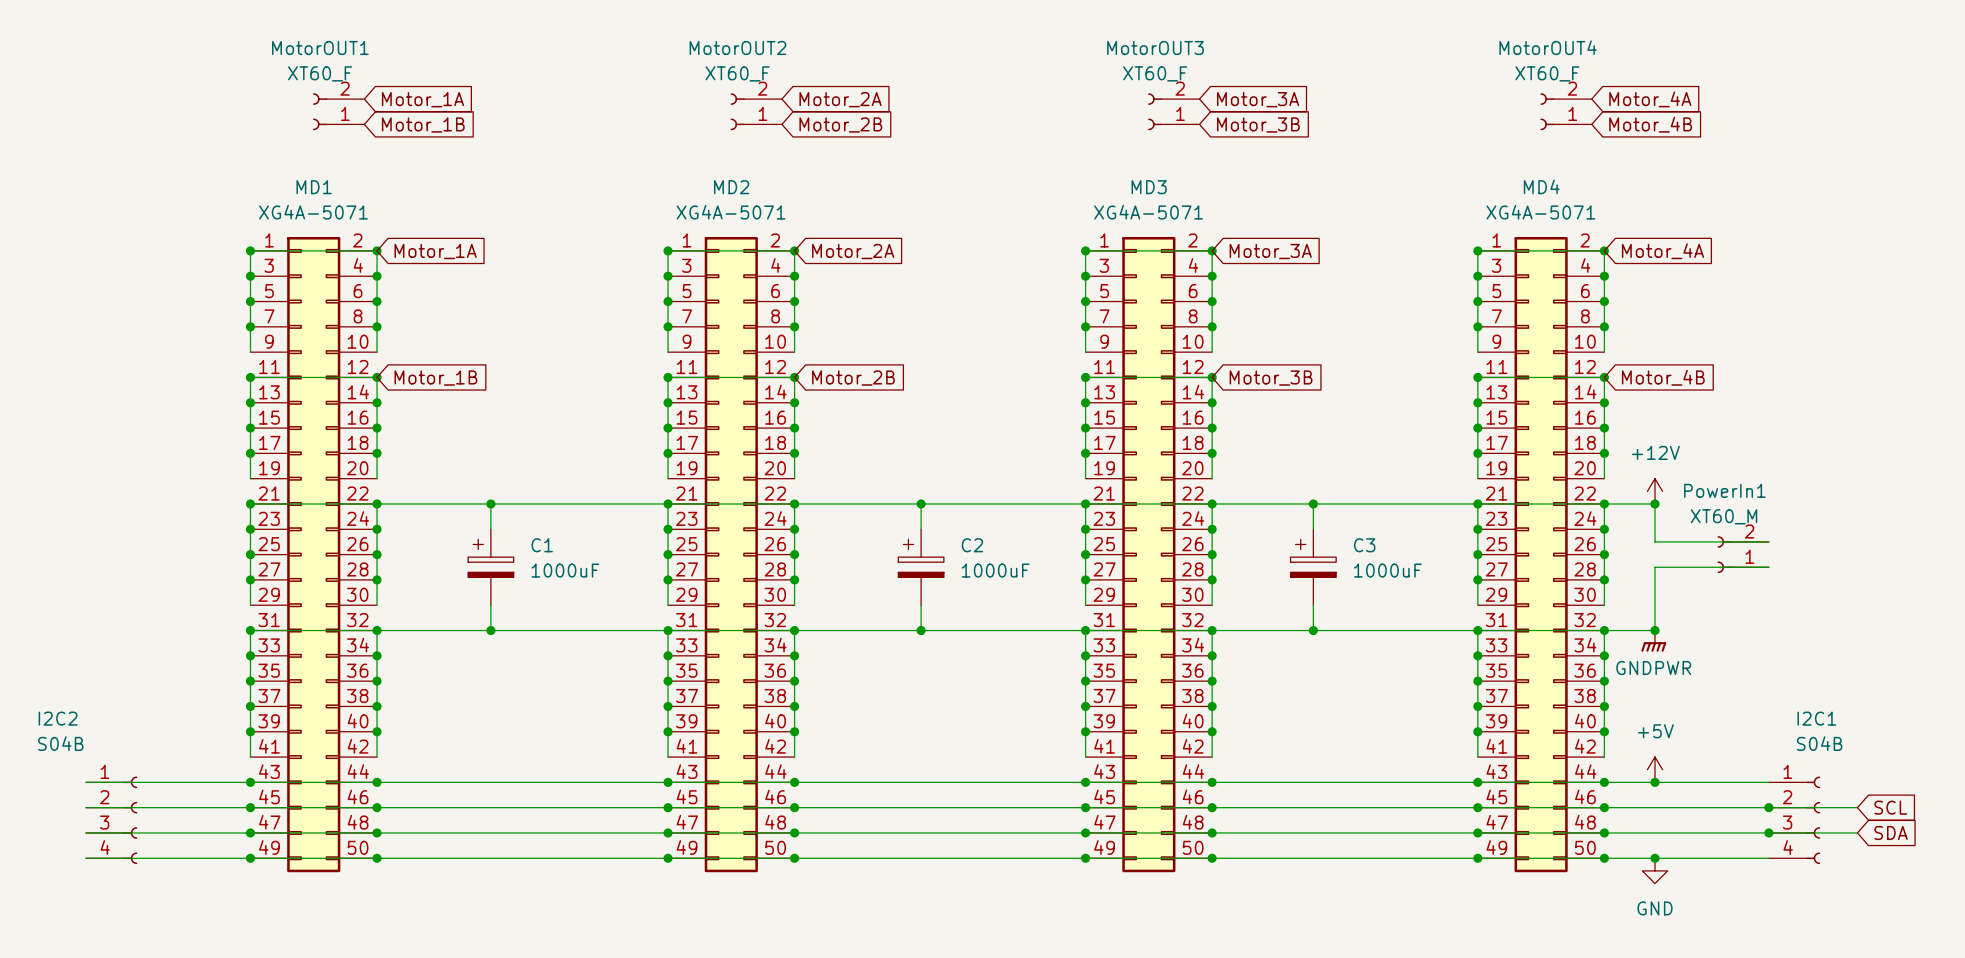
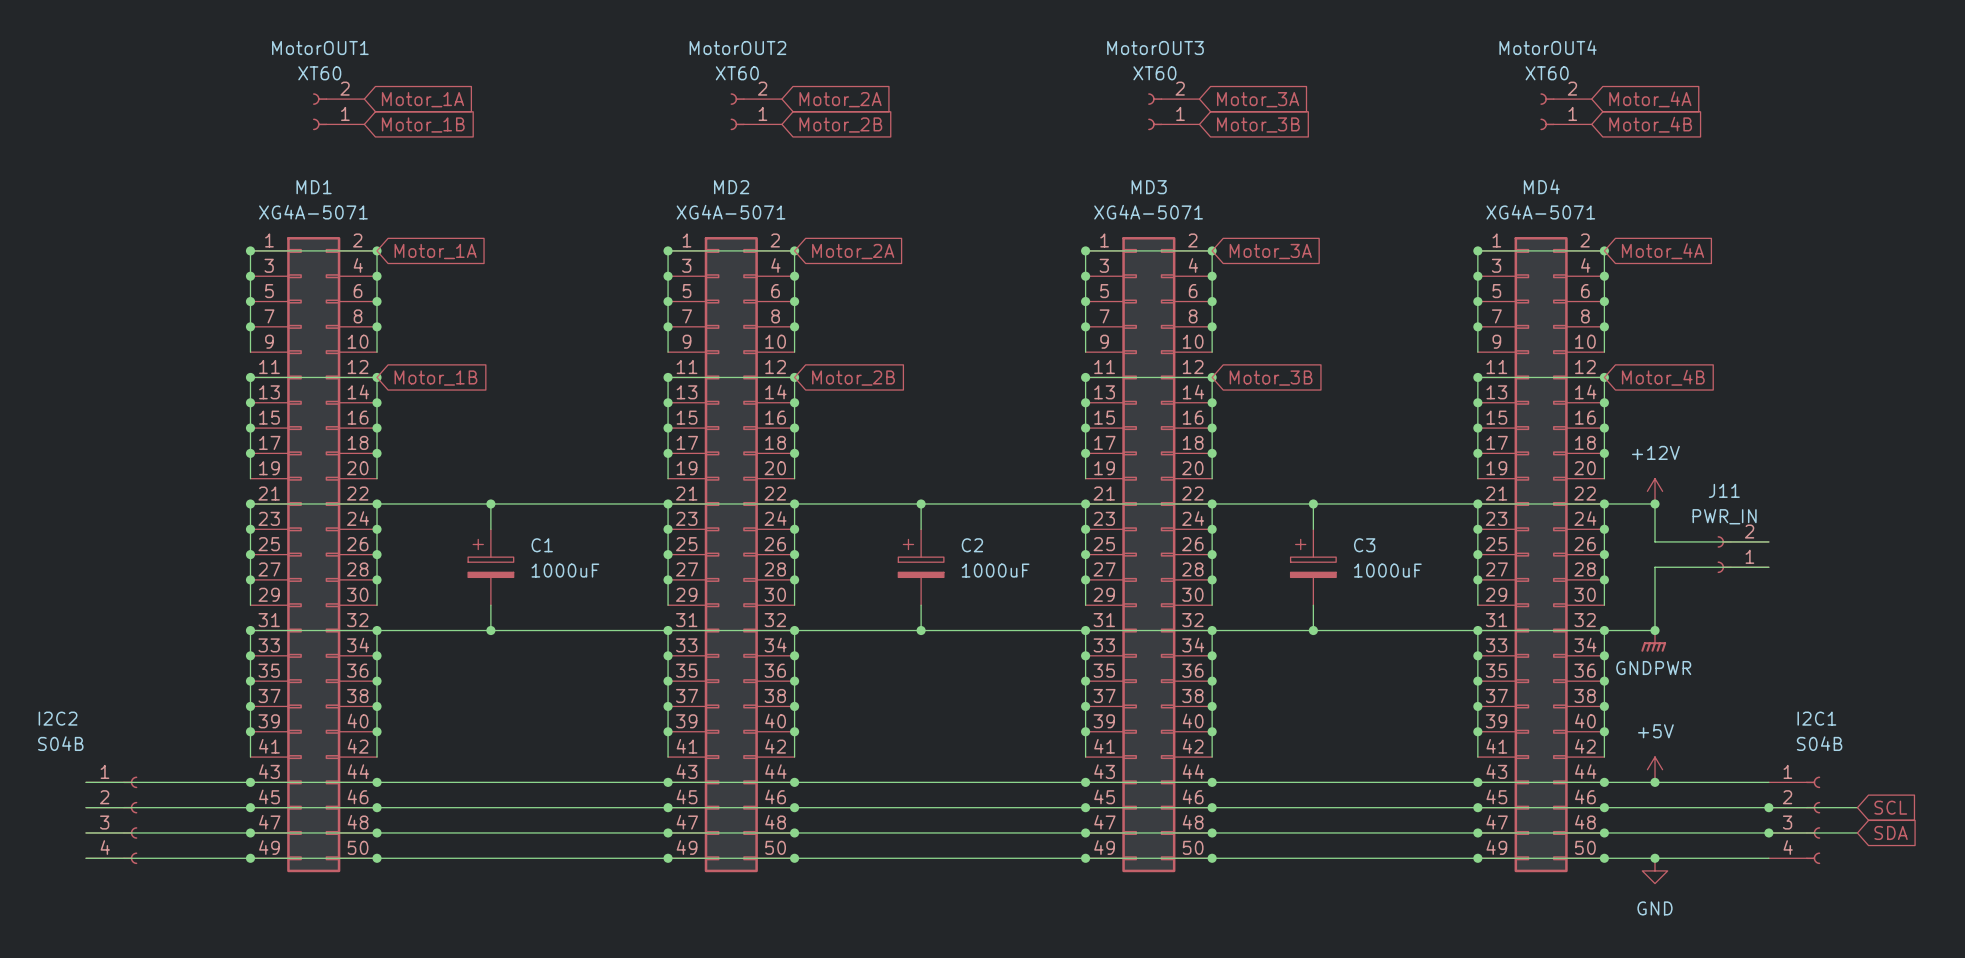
MotorOUT1 value: XT60_F (320, 73) -> XT60 (319, 73)
MotorOUT2 value: XT60_F (737, 73) -> XT60 (737, 73)
MotorOUT3 value: XT60_F (1155, 73) -> XT60 (1154, 73)
MotorOUT4 value: XT60_F (1547, 73) -> XT60 (1547, 73)
PowerIn1 name: PowerIn1 (1724, 490) -> J11 (1724, 490)
PowerIn1 value: XT60_M (1723, 516) -> PWR_IN (1724, 516)

